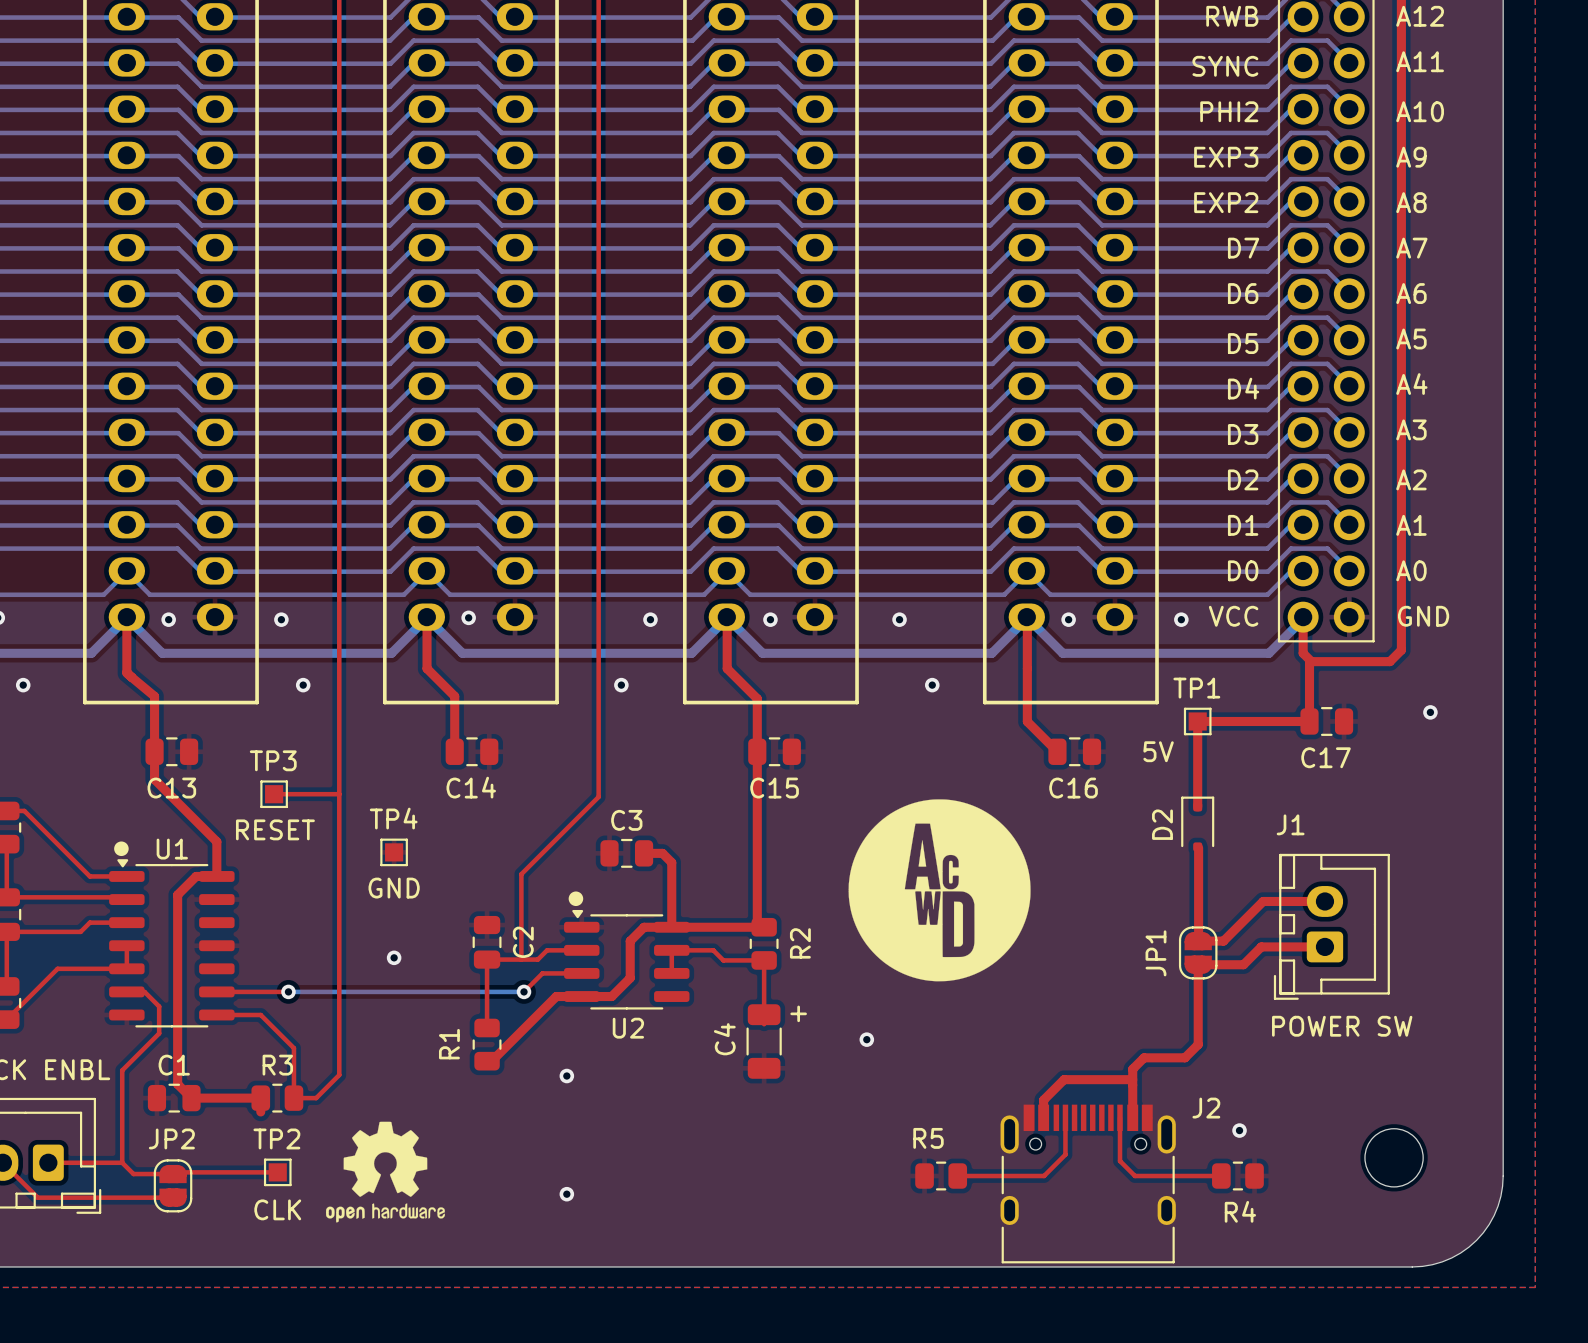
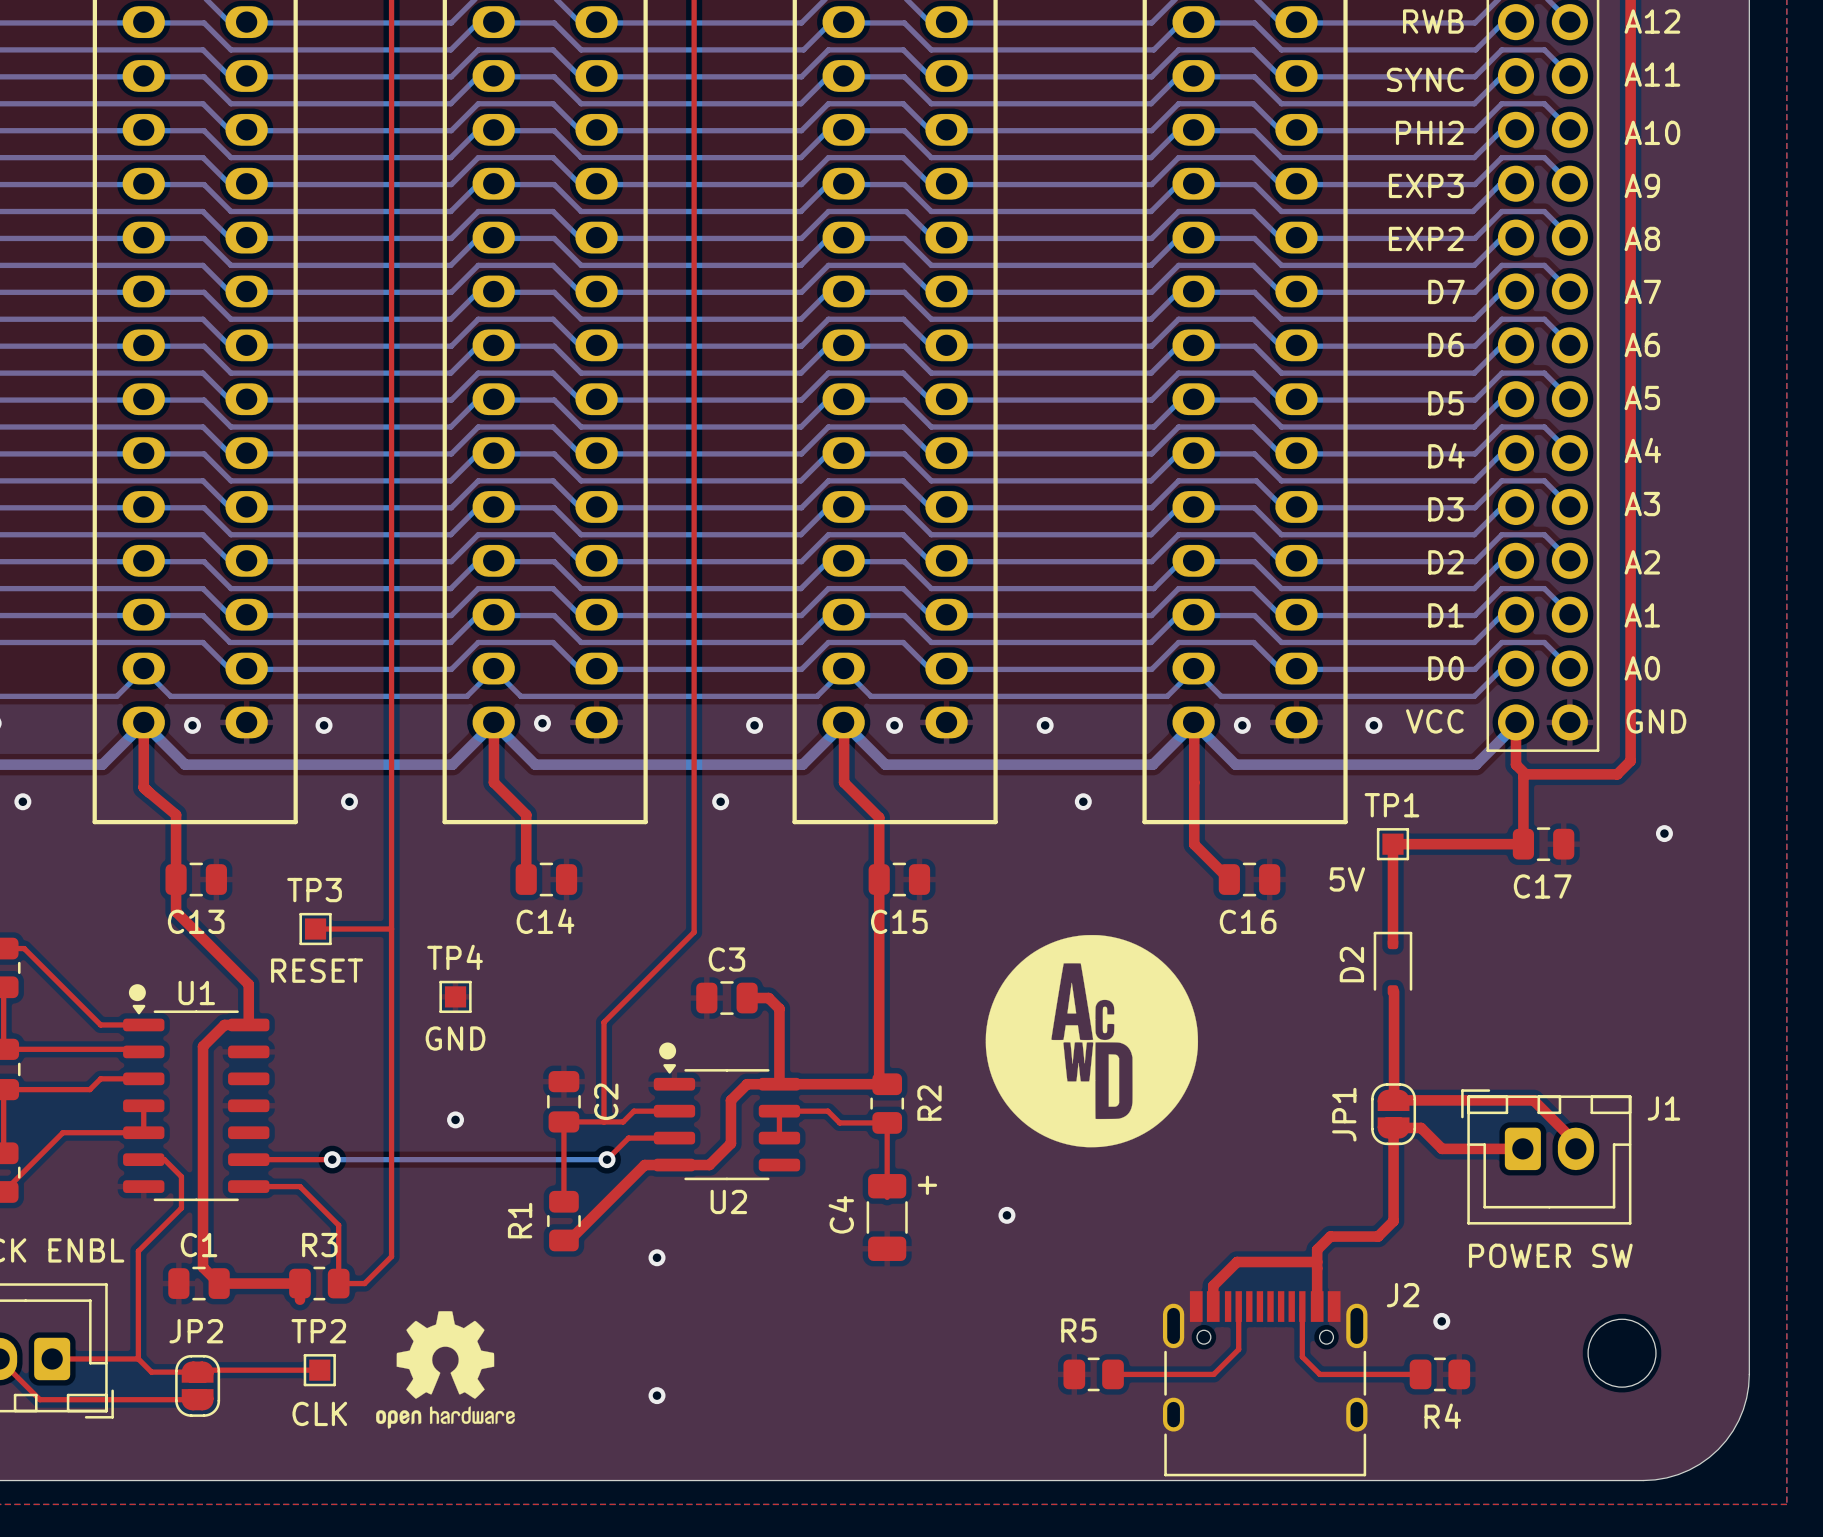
top track: (1324, 901) (1263, 901) (1223, 941) -> (1575, 1148) (1575, 1142) (1533, 1100) (1423, 1100)
J1 rotation: 0° (1331, 926) -> 90° clockwise (1546, 1156)
top track: (1324, 946) (1261, 946) (1243, 964) (1221, 964) -> (1522, 1148) (1442, 1148) (1421, 1127)
text position: POWER SW (1342, 1026) -> POWER SW (1550, 1255)

